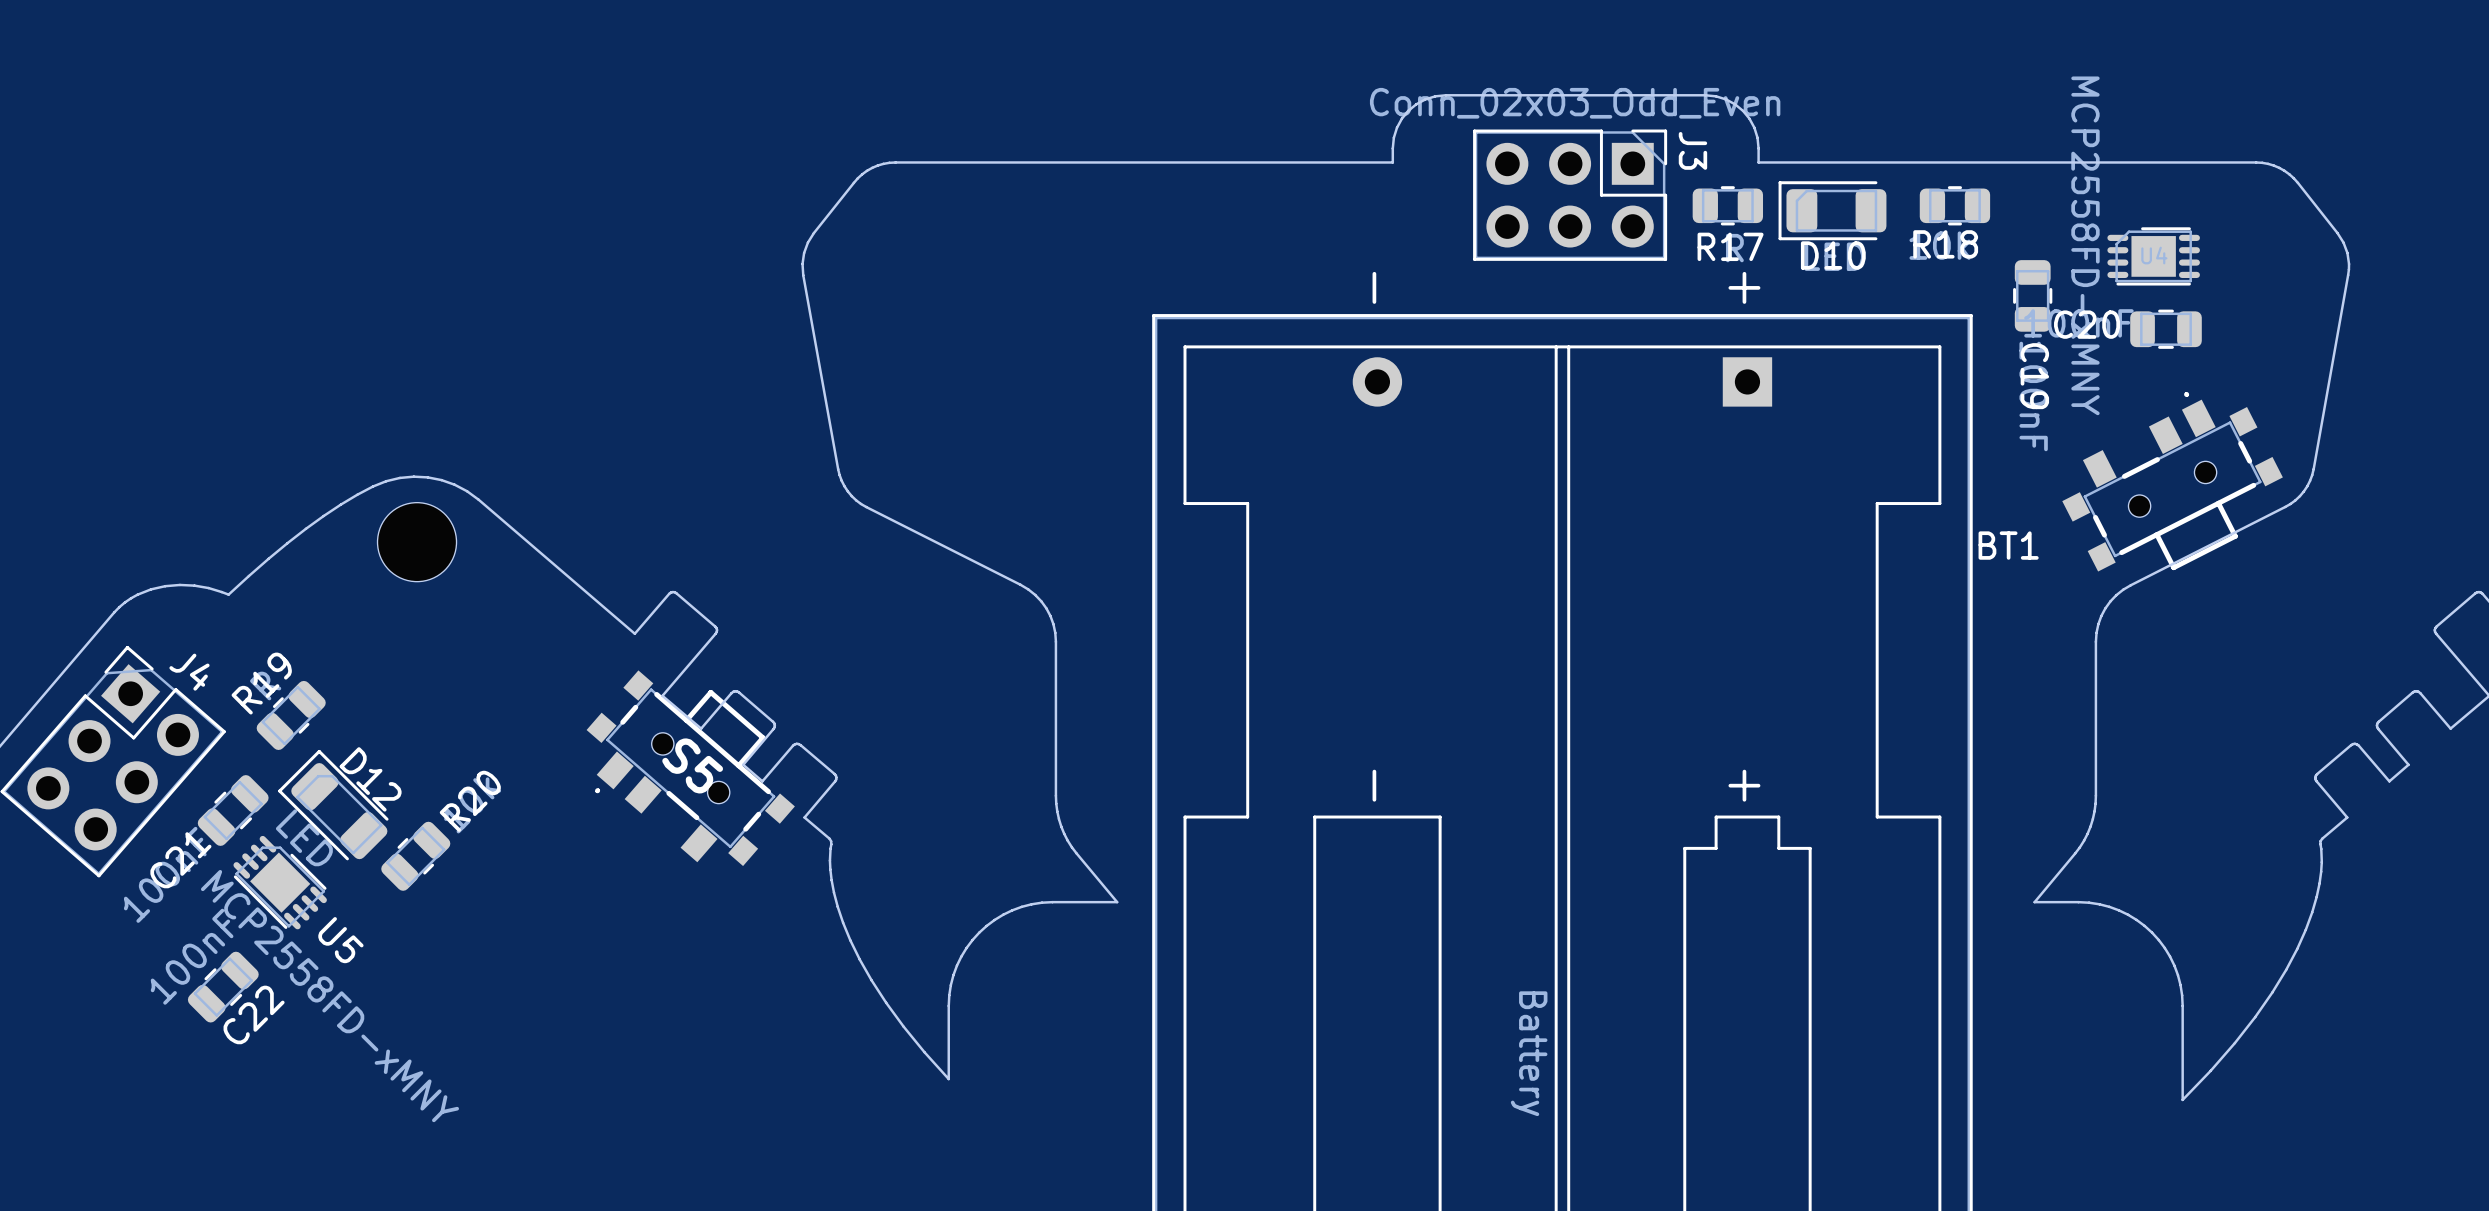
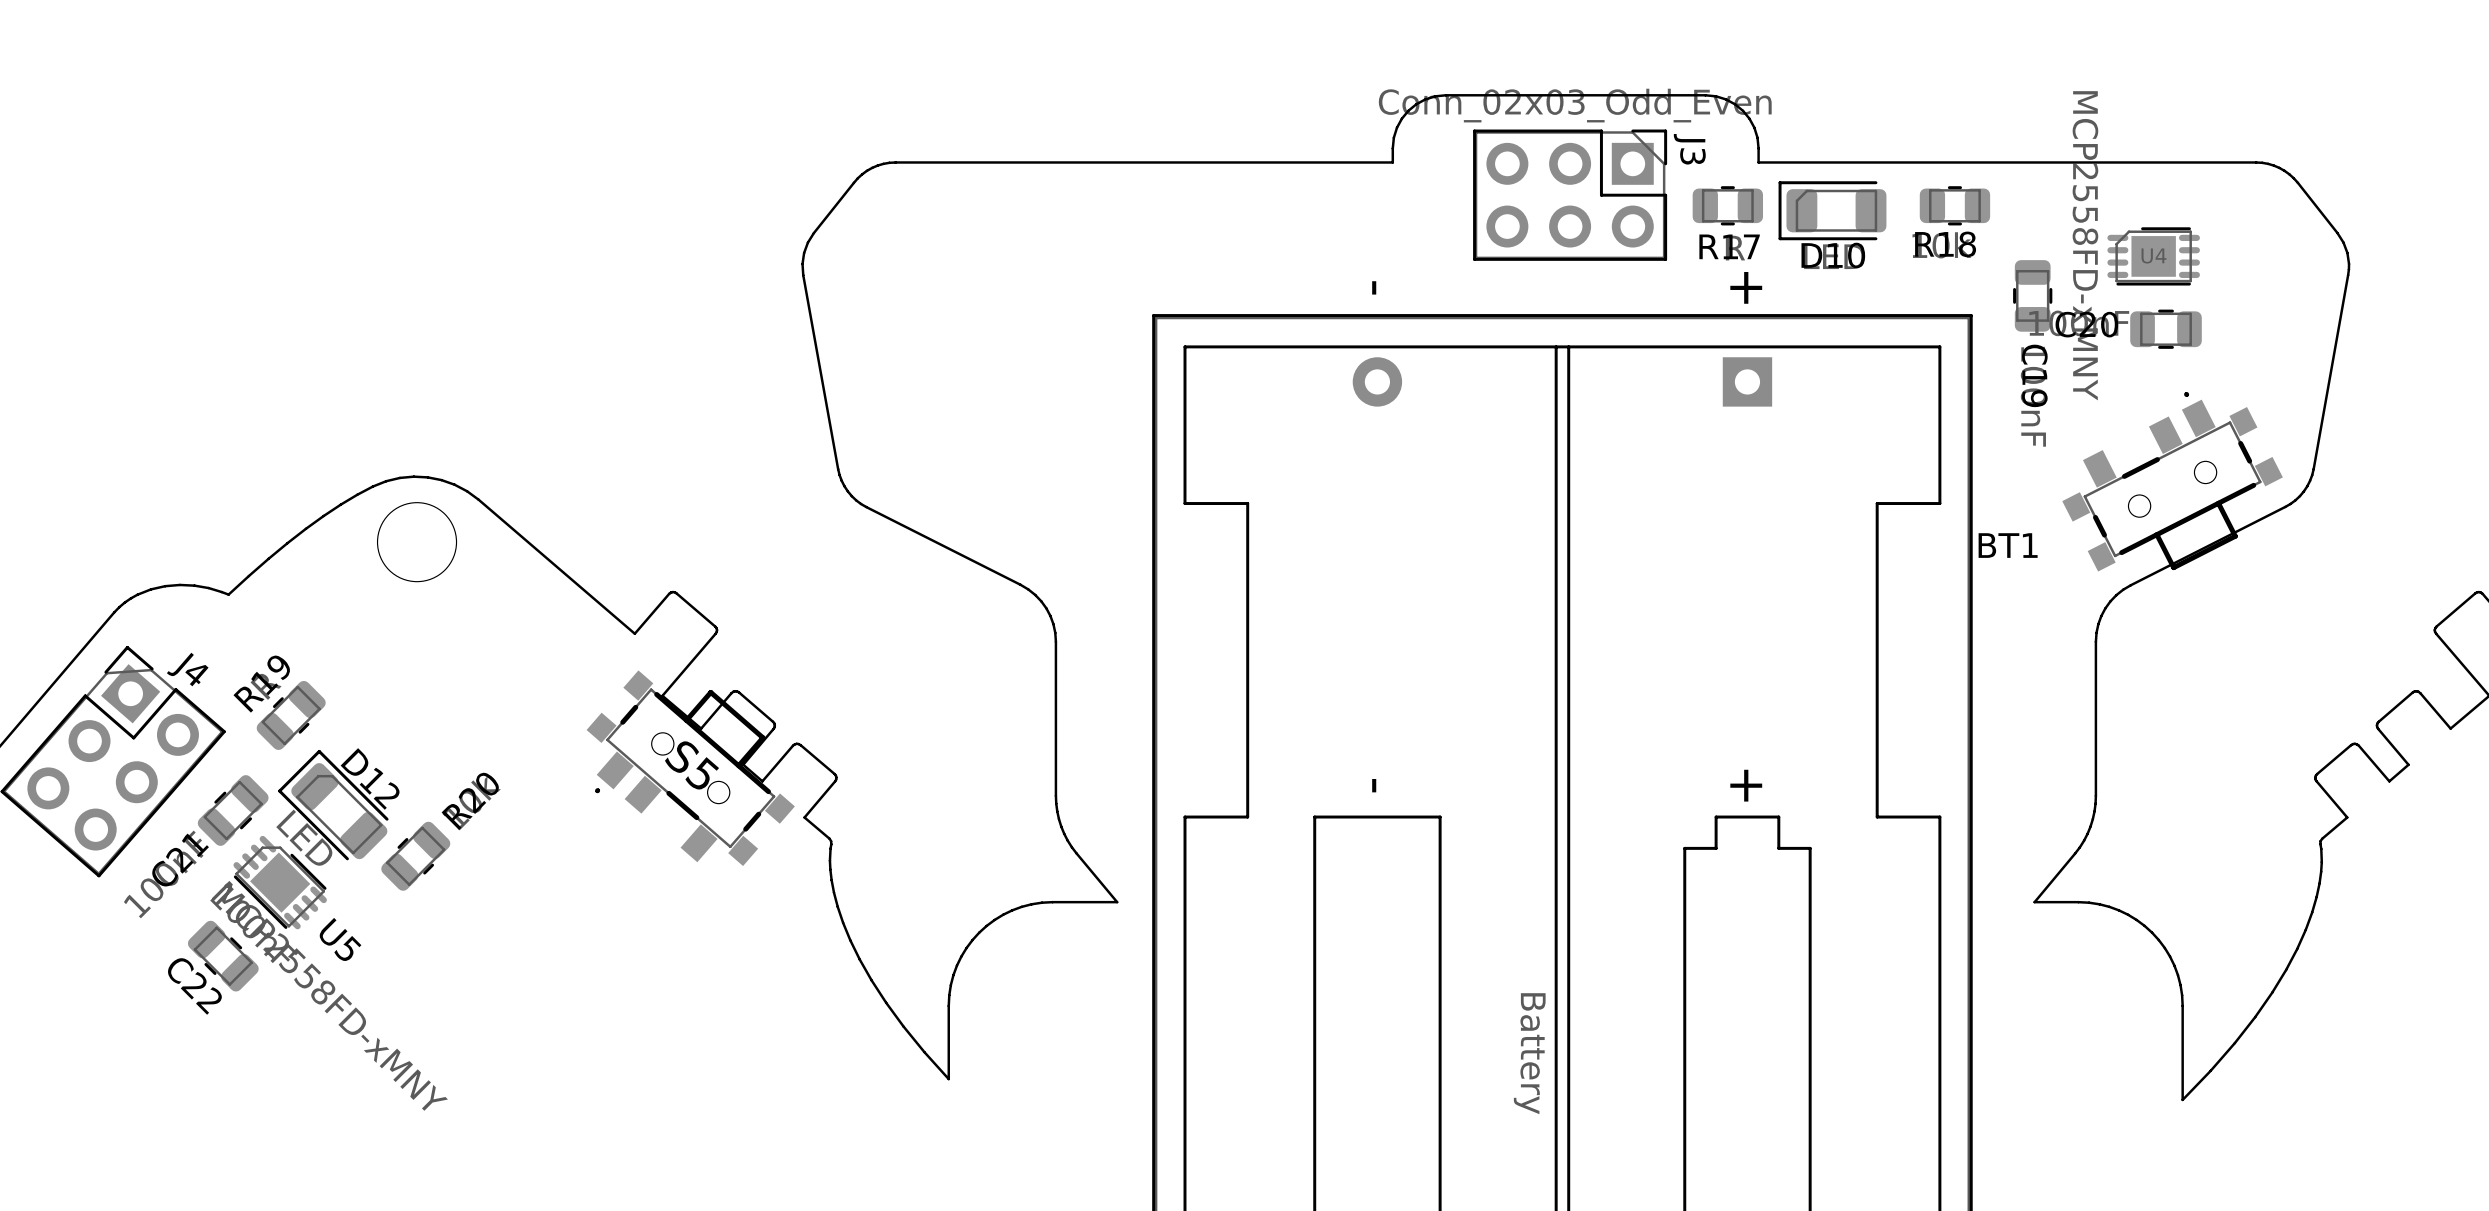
C22 rotation: 0° (223, 987) -> 90° clockwise (223, 956)

